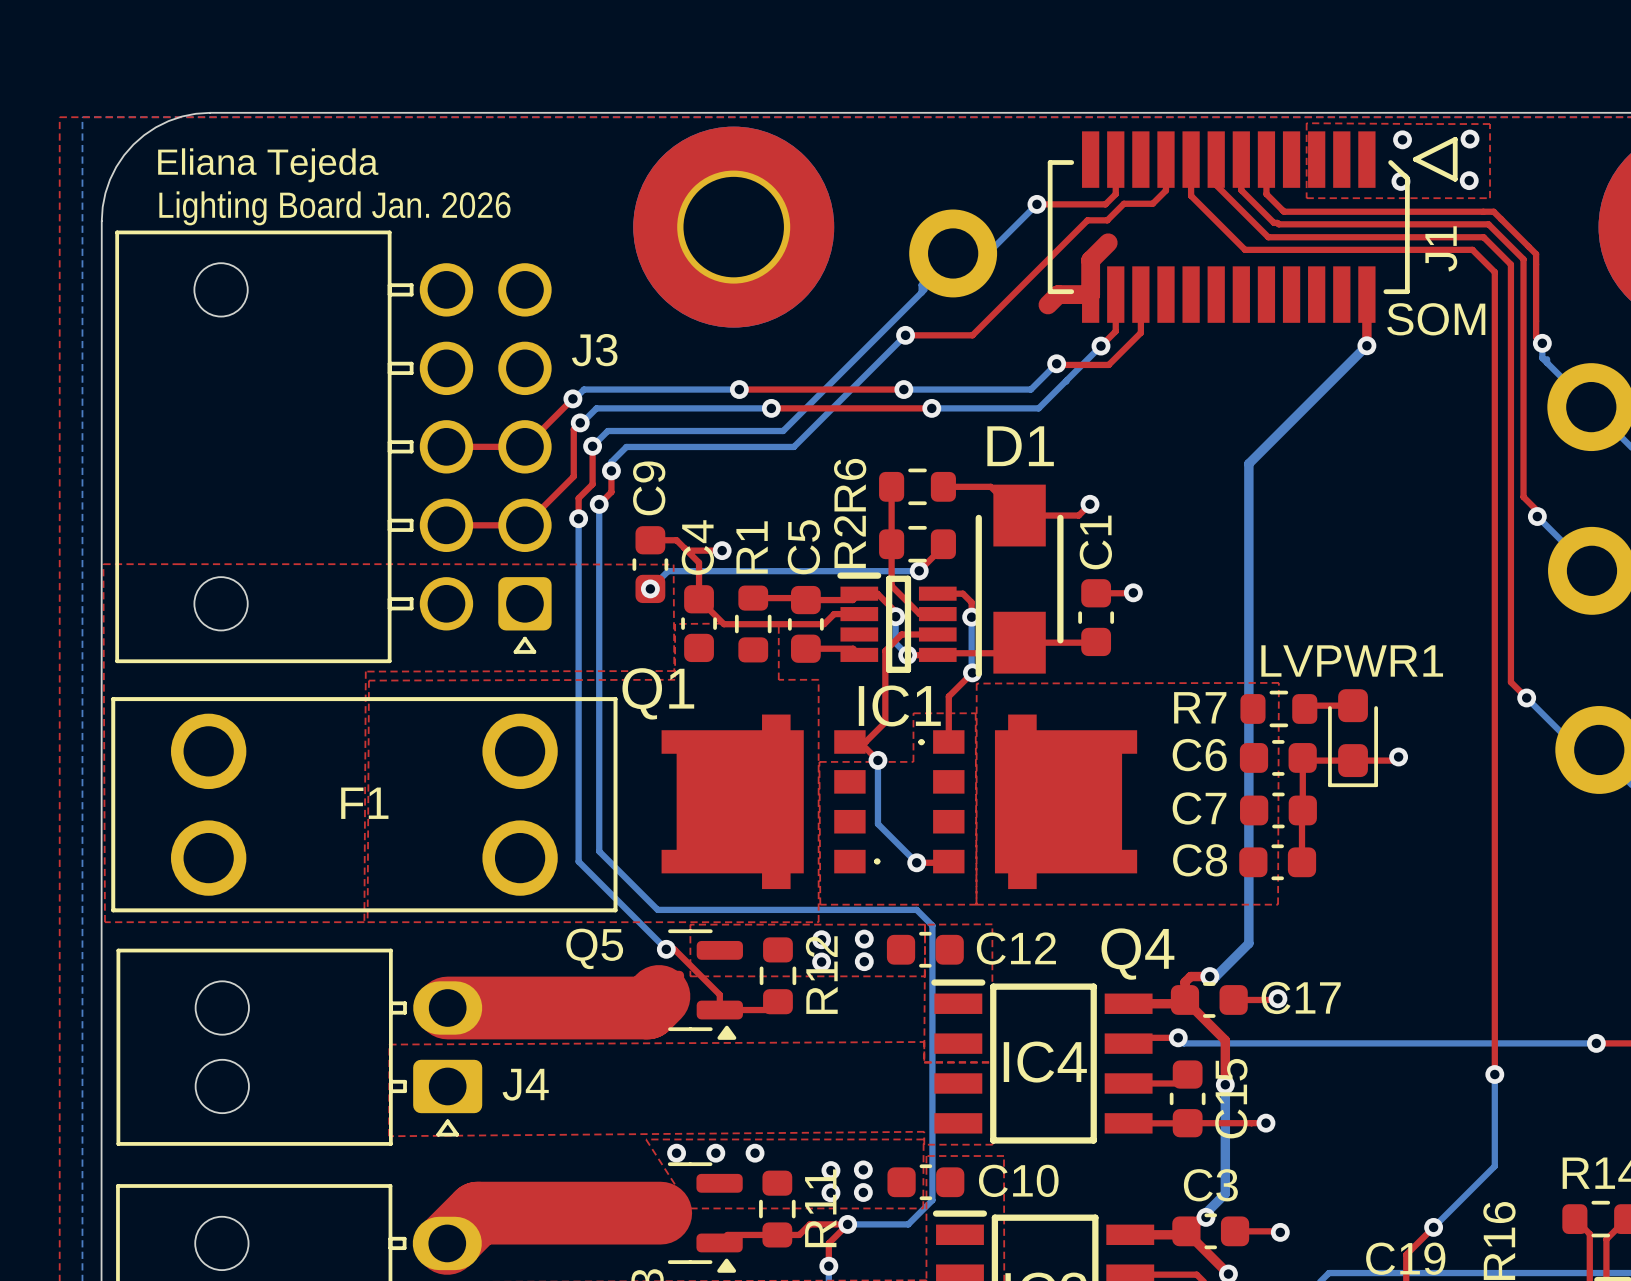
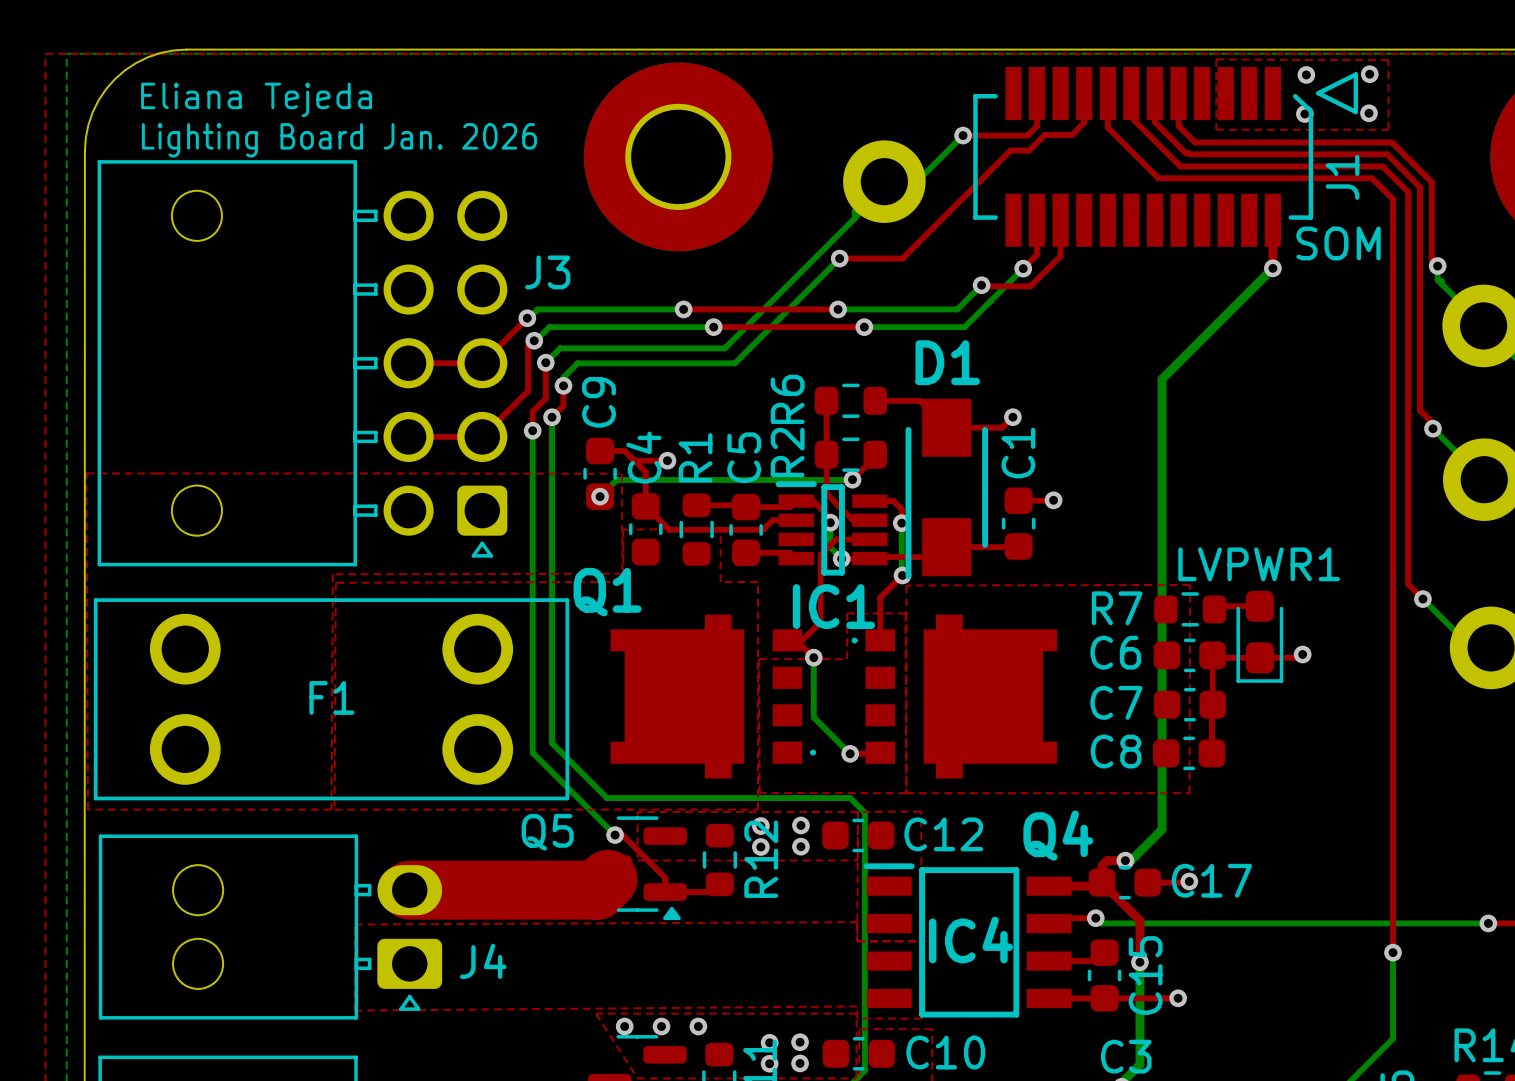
top track: (1108, 242) (1090, 260) (1090, 294) (1058, 294) (1047, 304) -> none

